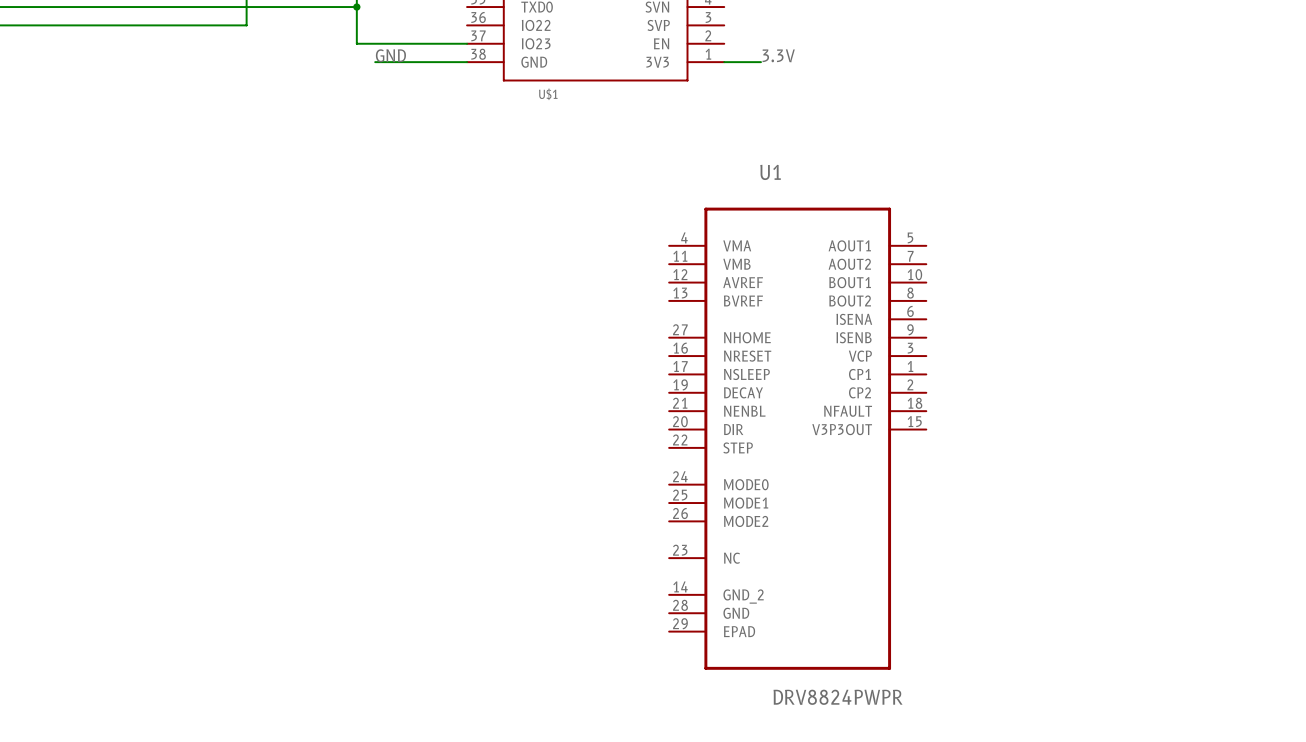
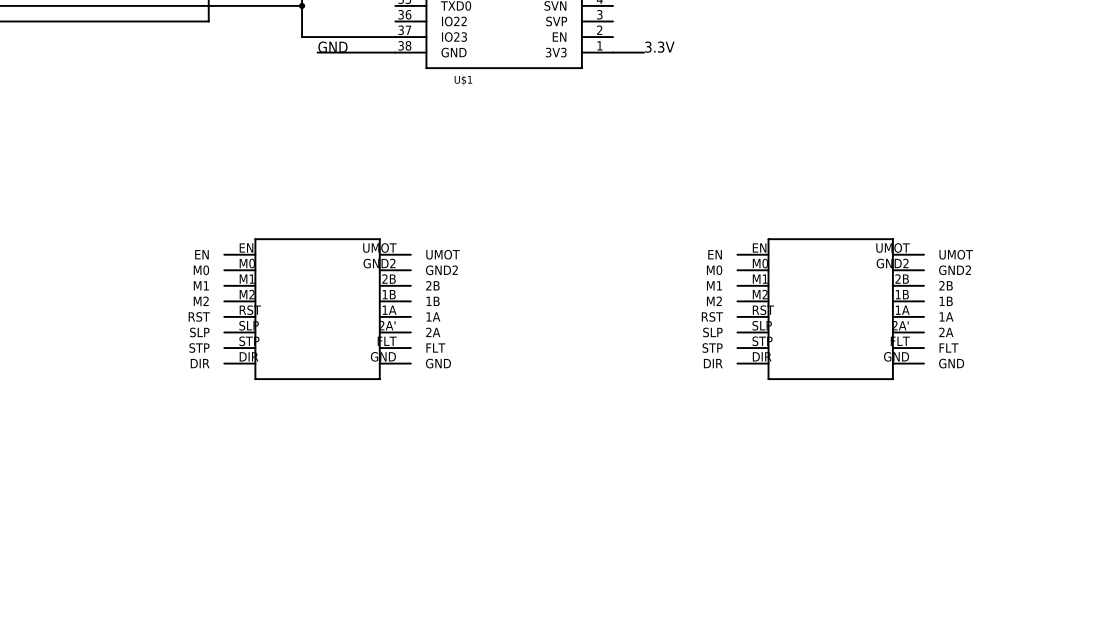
part: none -> (317, 309)
part: none -> (830, 309)
U1: DRV8824PWPR (797, 438) -> none

